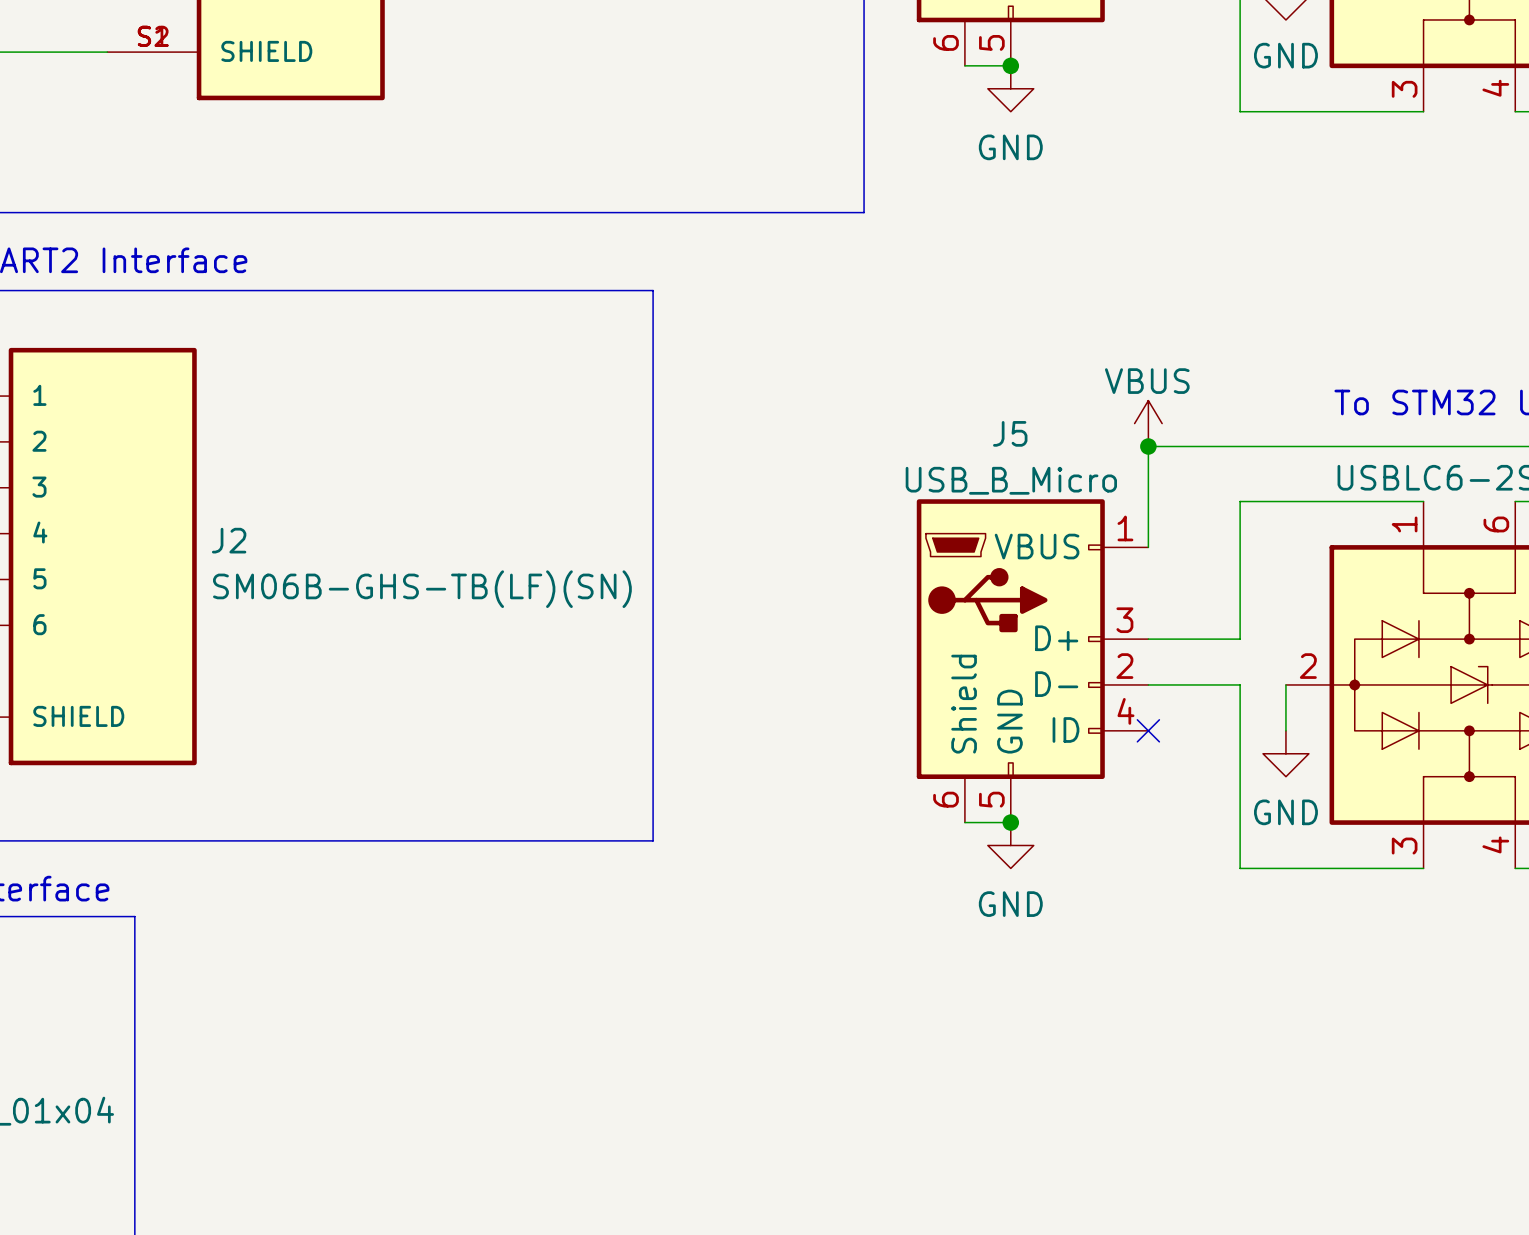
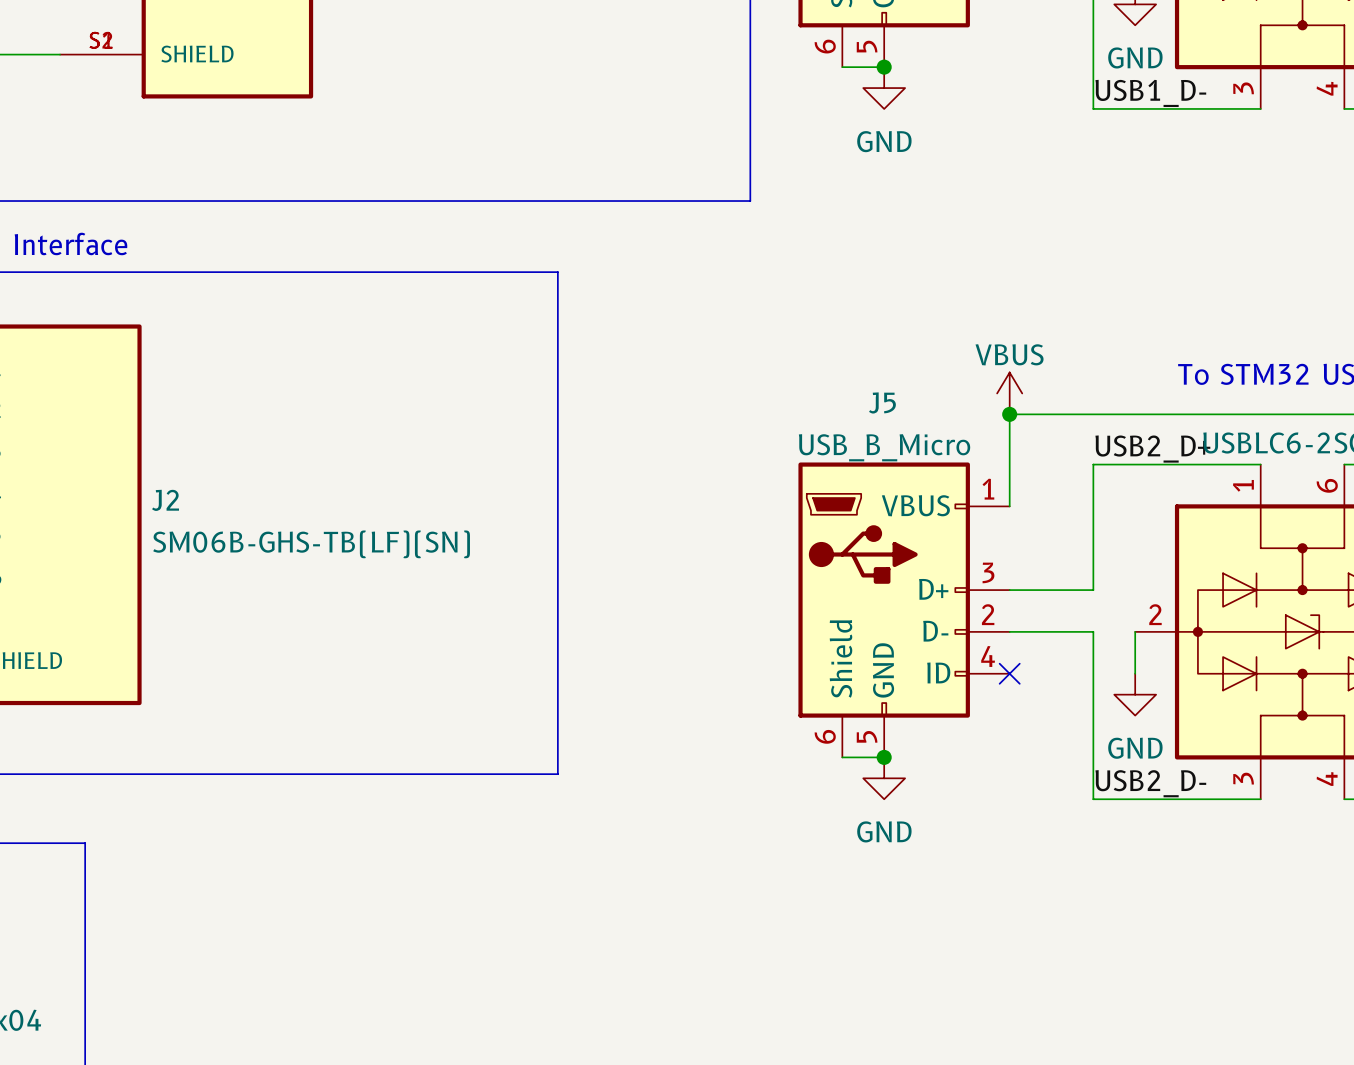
label: none -> USB1_D- (1150, 93)
label: none -> USB2_D+ (1152, 449)
label: none -> USB2_D- (1150, 783)

